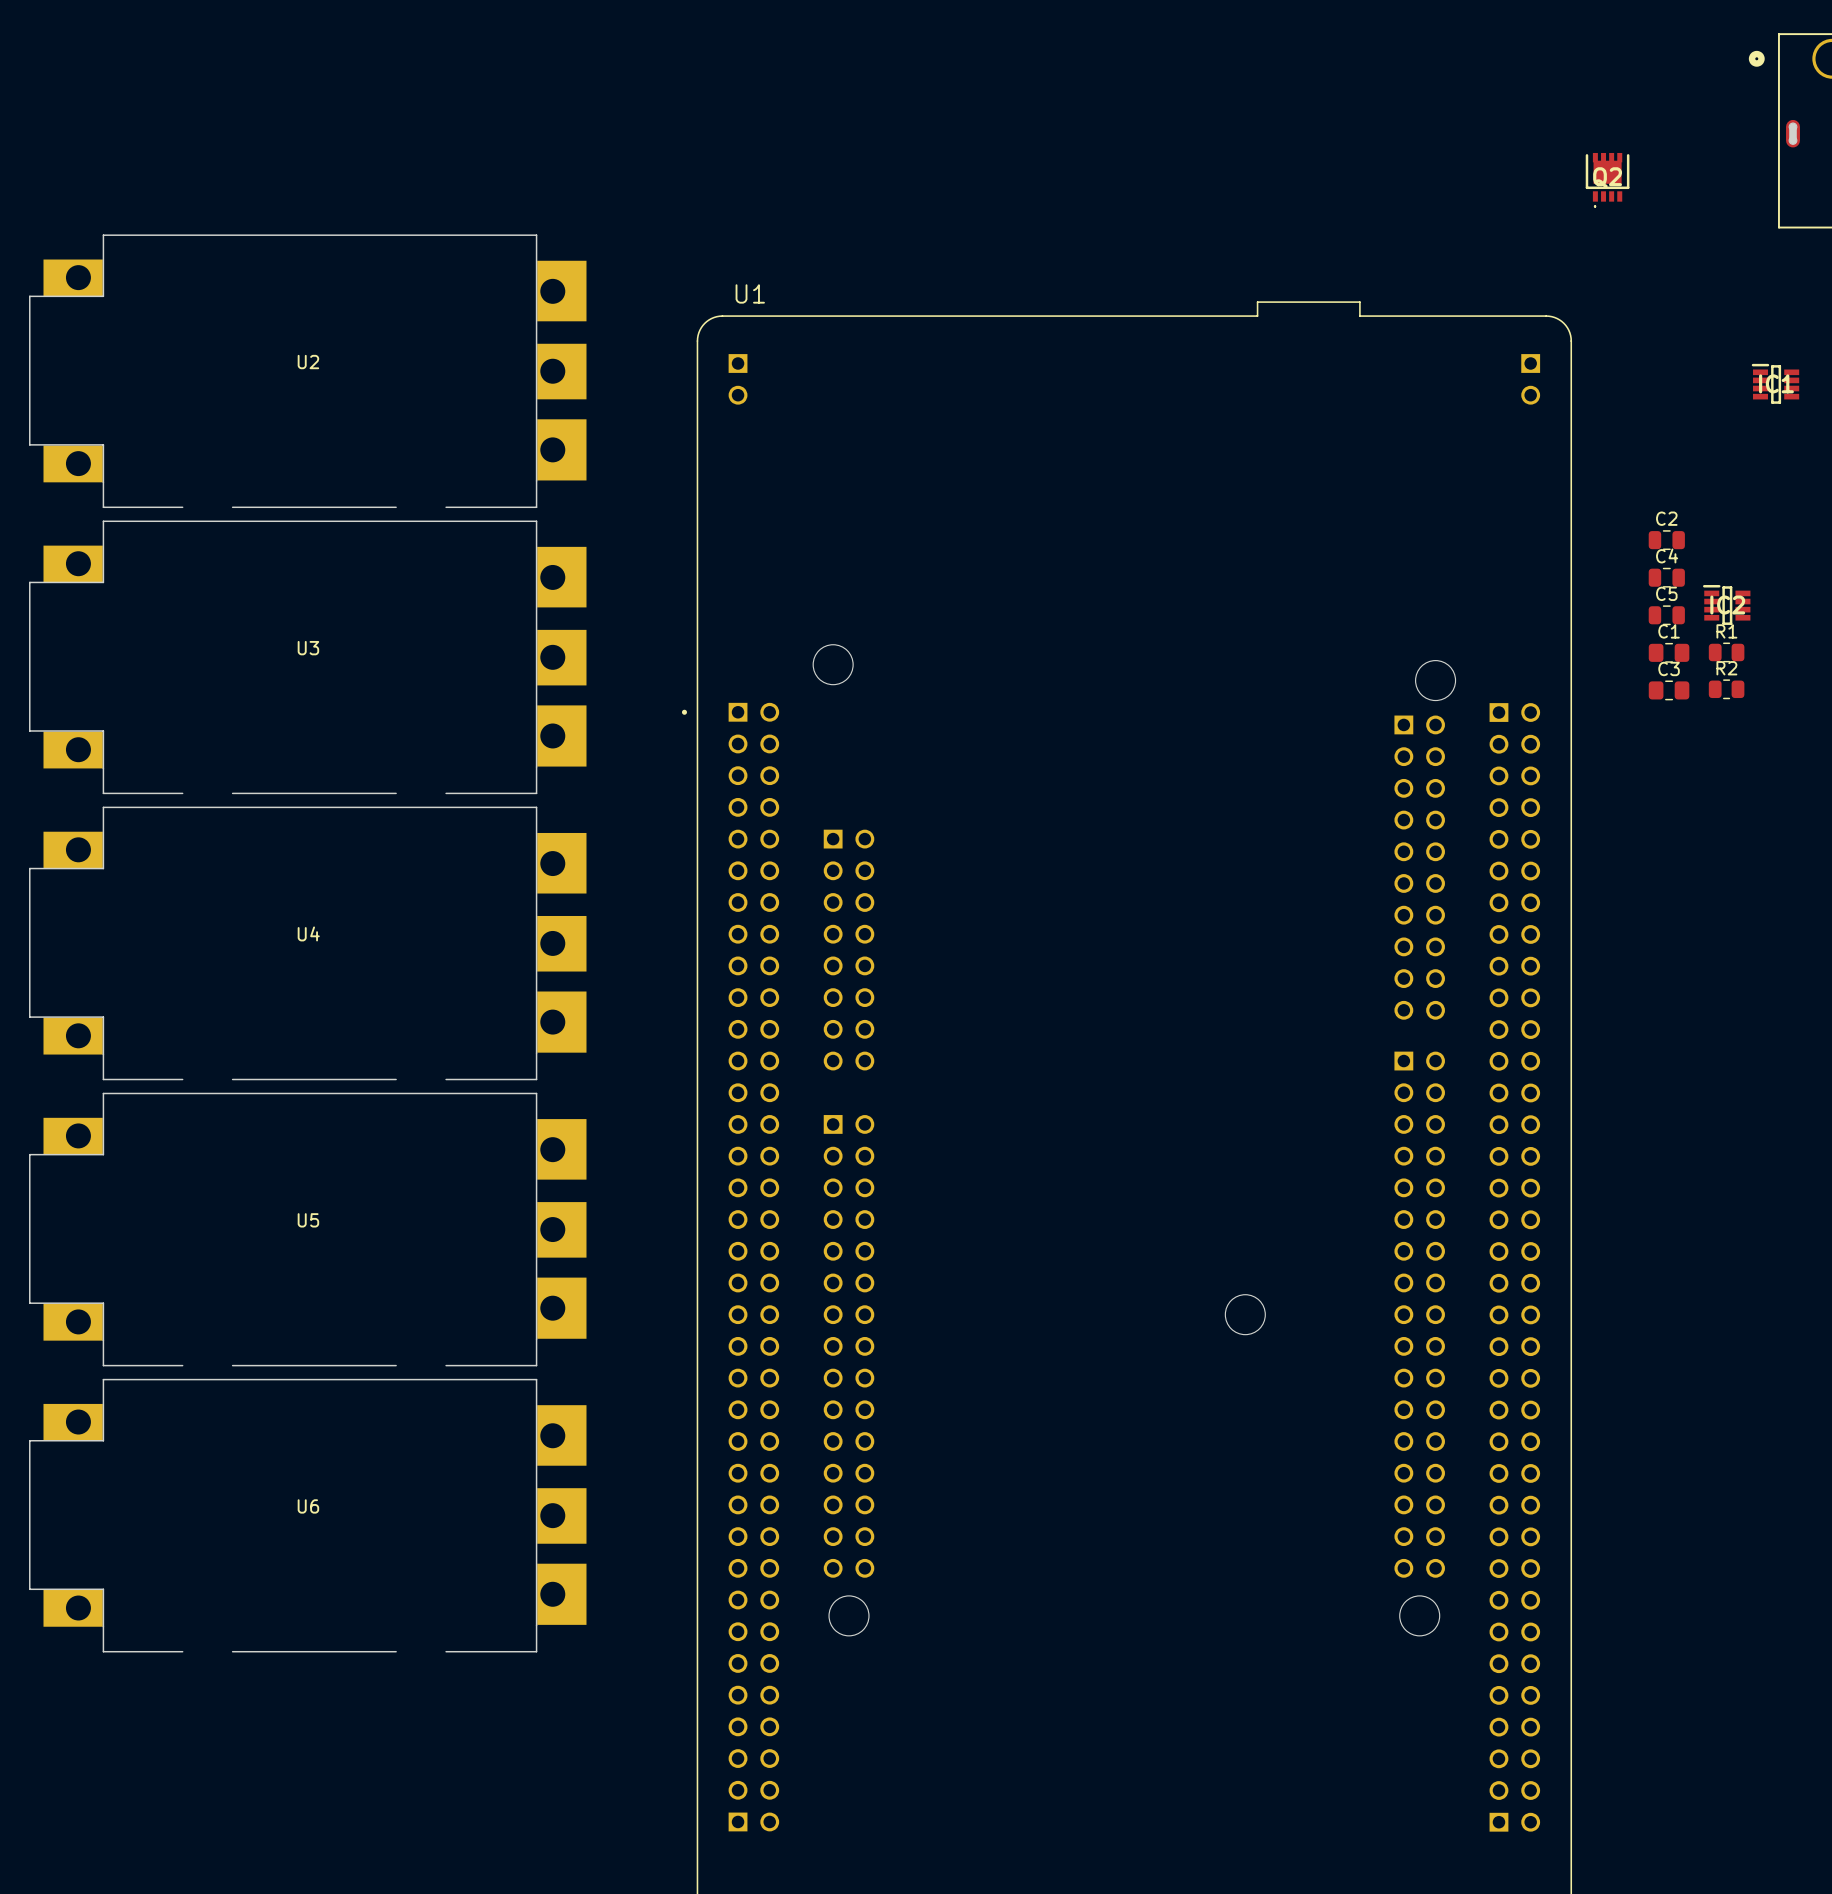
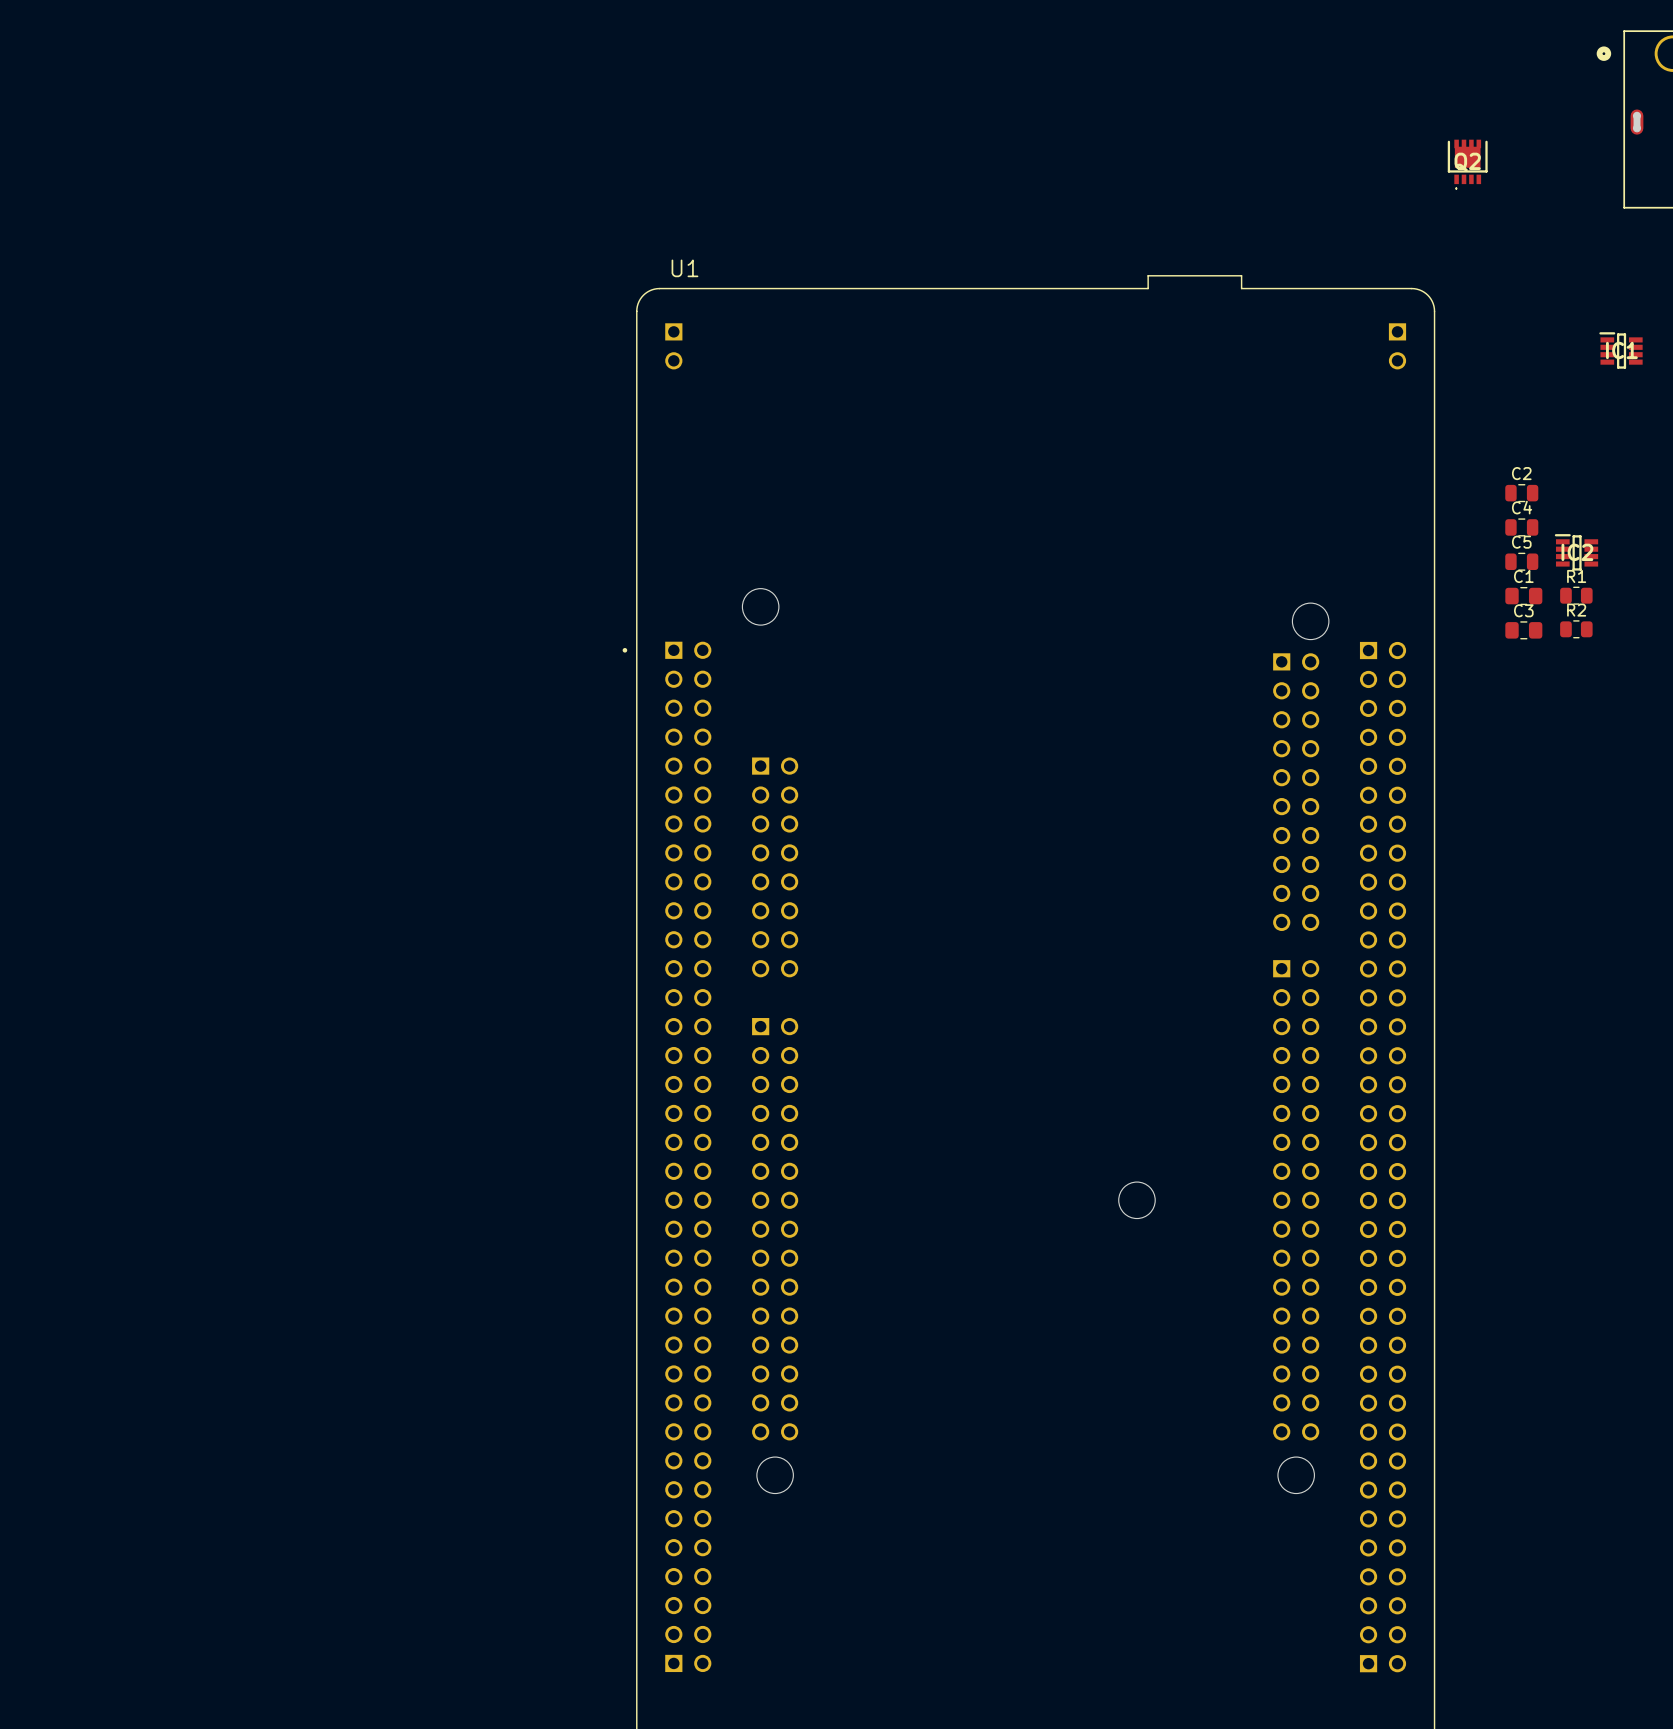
U2: (307, 371) -> none
U3: (307, 657) -> none
U4: (307, 943) -> none
U5: (307, 1229) -> none
U6: (307, 1515) -> none

